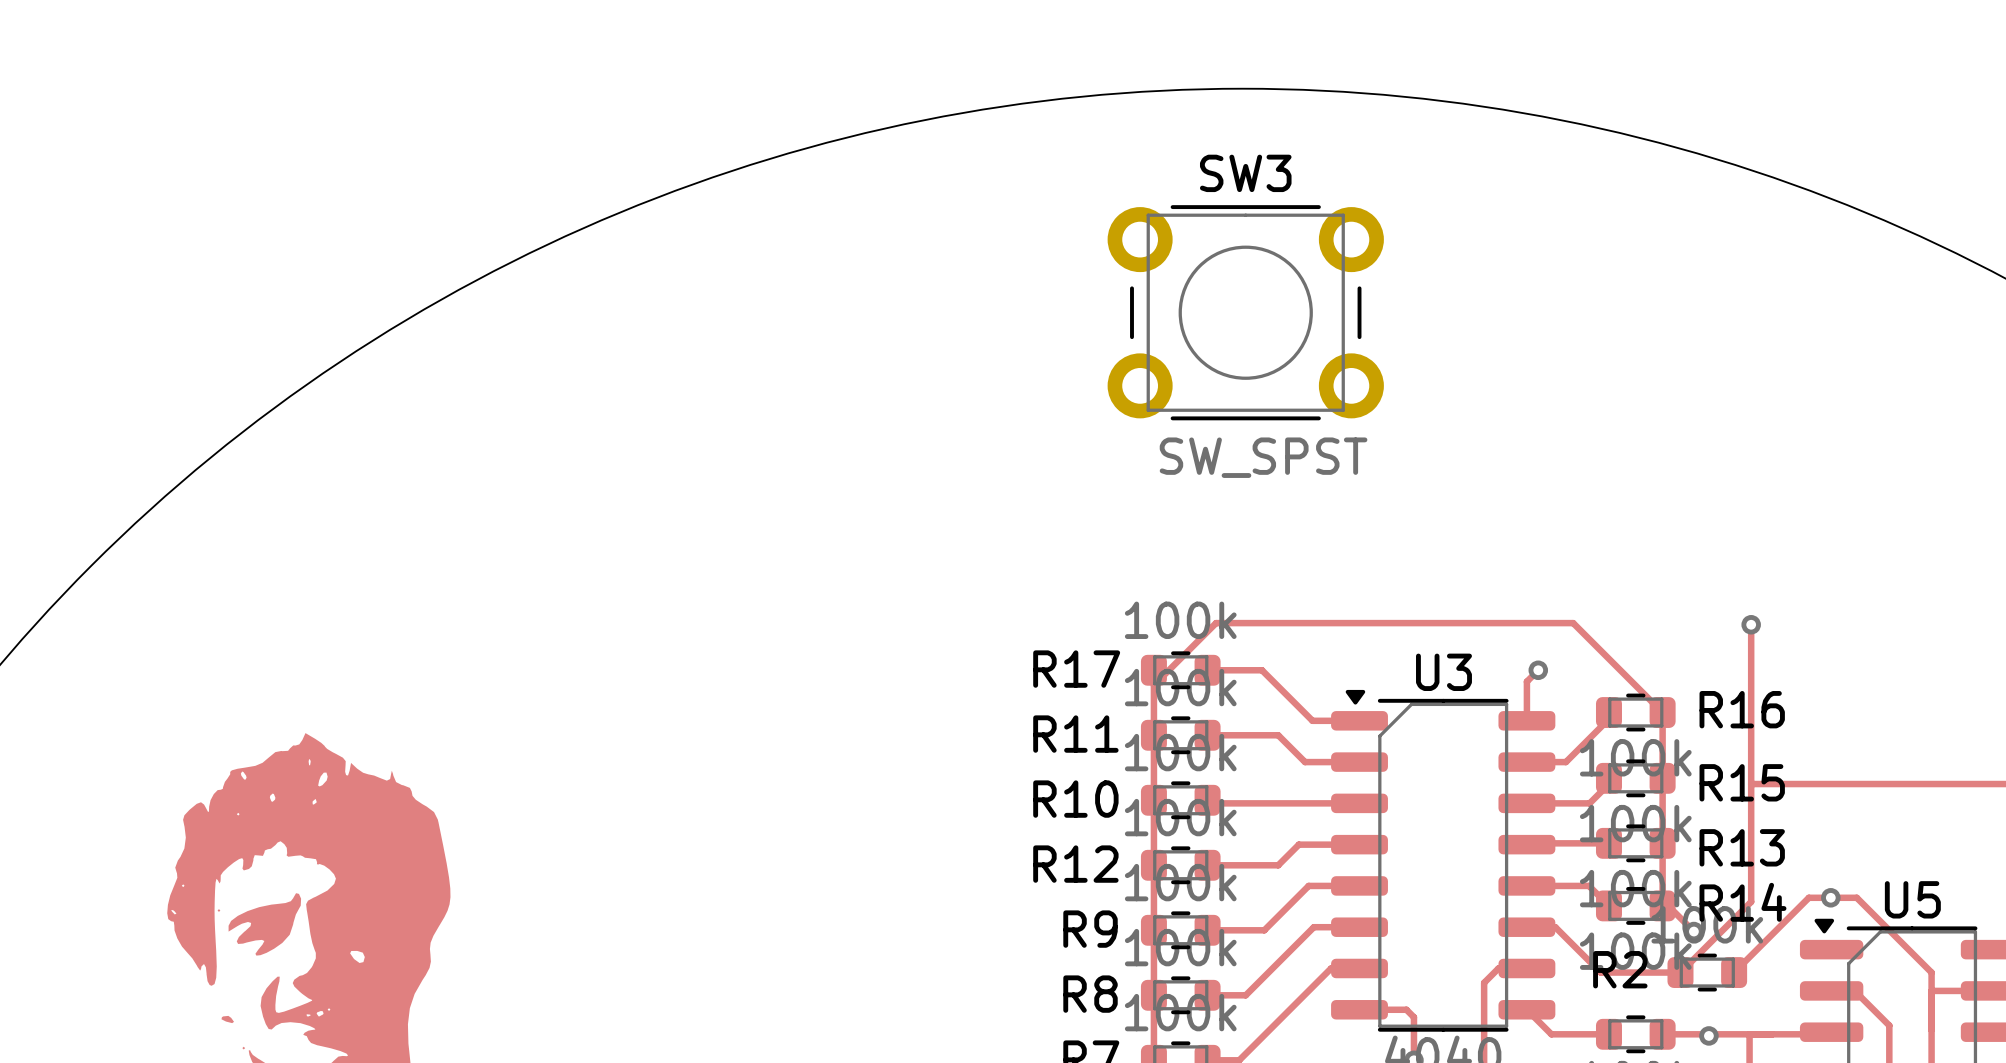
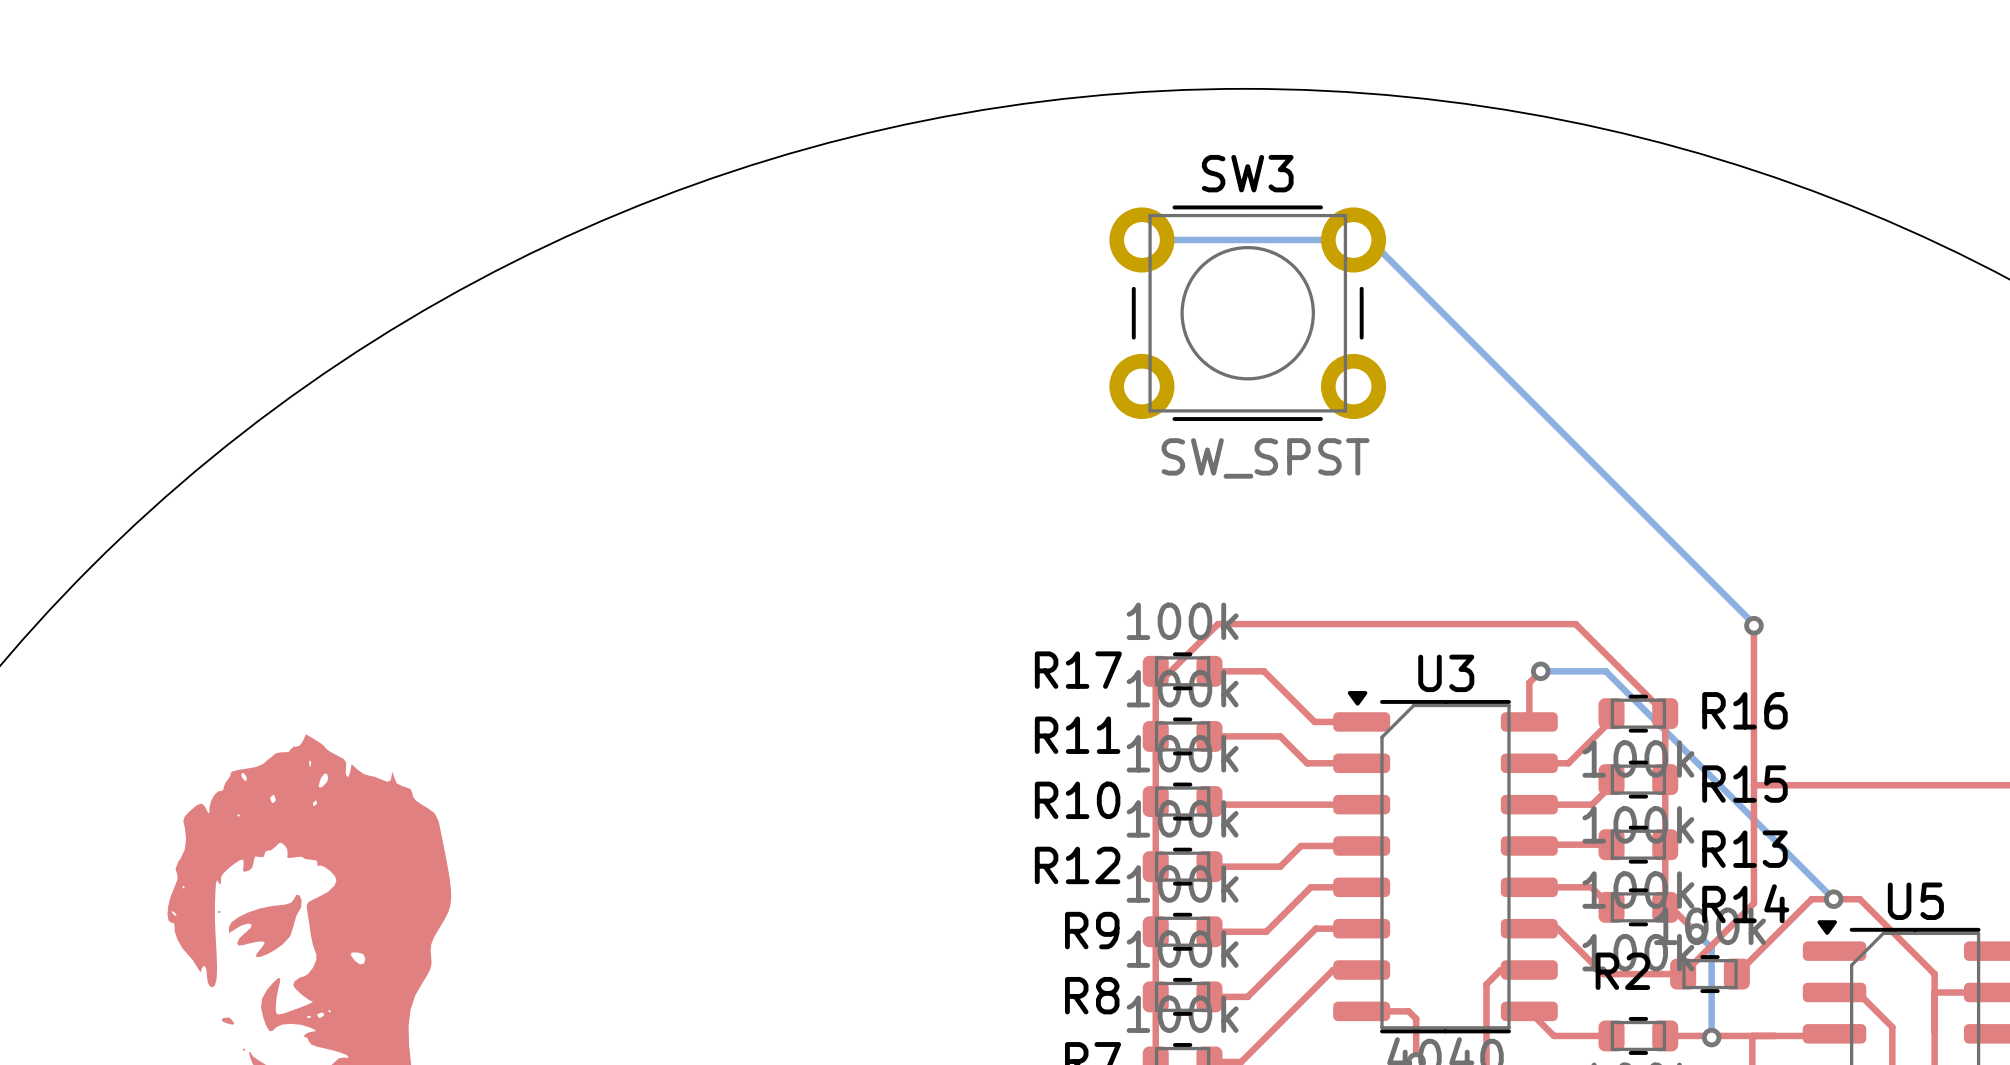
bottom track: none -> (1141, 239) (1369, 239) (1753, 625)
bottom track: none -> (1540, 671) (1605, 671) (1833, 899)
bottom track: none -> (1696, 933) (1711, 948) (1711, 1037)

